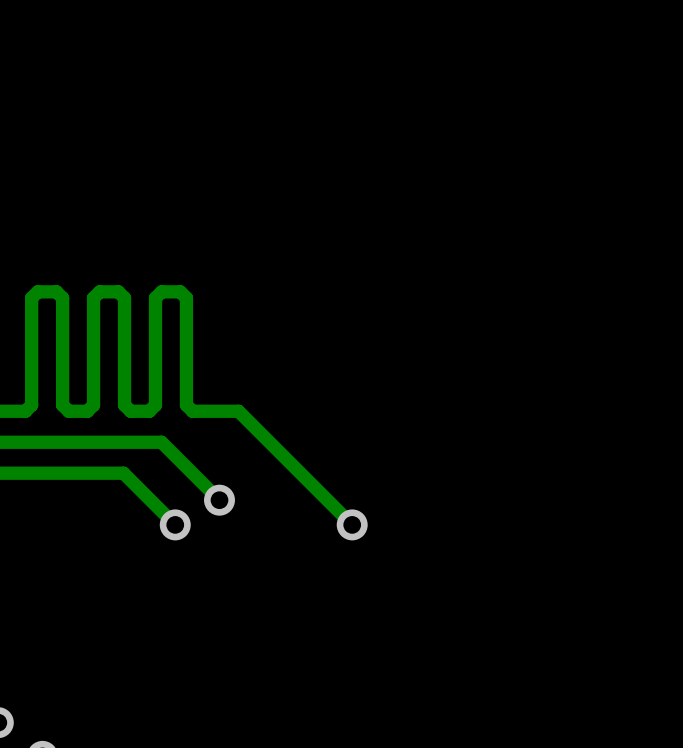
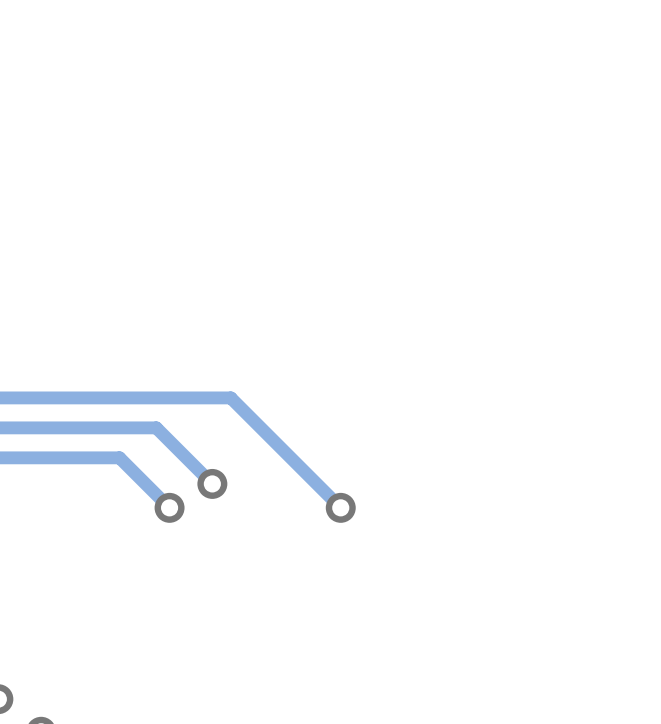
track: (68, 411) (62, 405) (62, 298) (56, 291) (37, 291) (31, 298) (31, 405) (25, 411) -> (66, 397) (24, 397)
track: (130, 411) (124, 405) (124, 298) (118, 291) (99, 291) (93, 298) (93, 405) (87, 411) -> (126, 397) (84, 397)
track: (192, 411) (186, 405) (186, 298) (180, 291) (161, 291) (155, 298) (155, 405) (149, 411) -> (186, 397) (144, 397)

